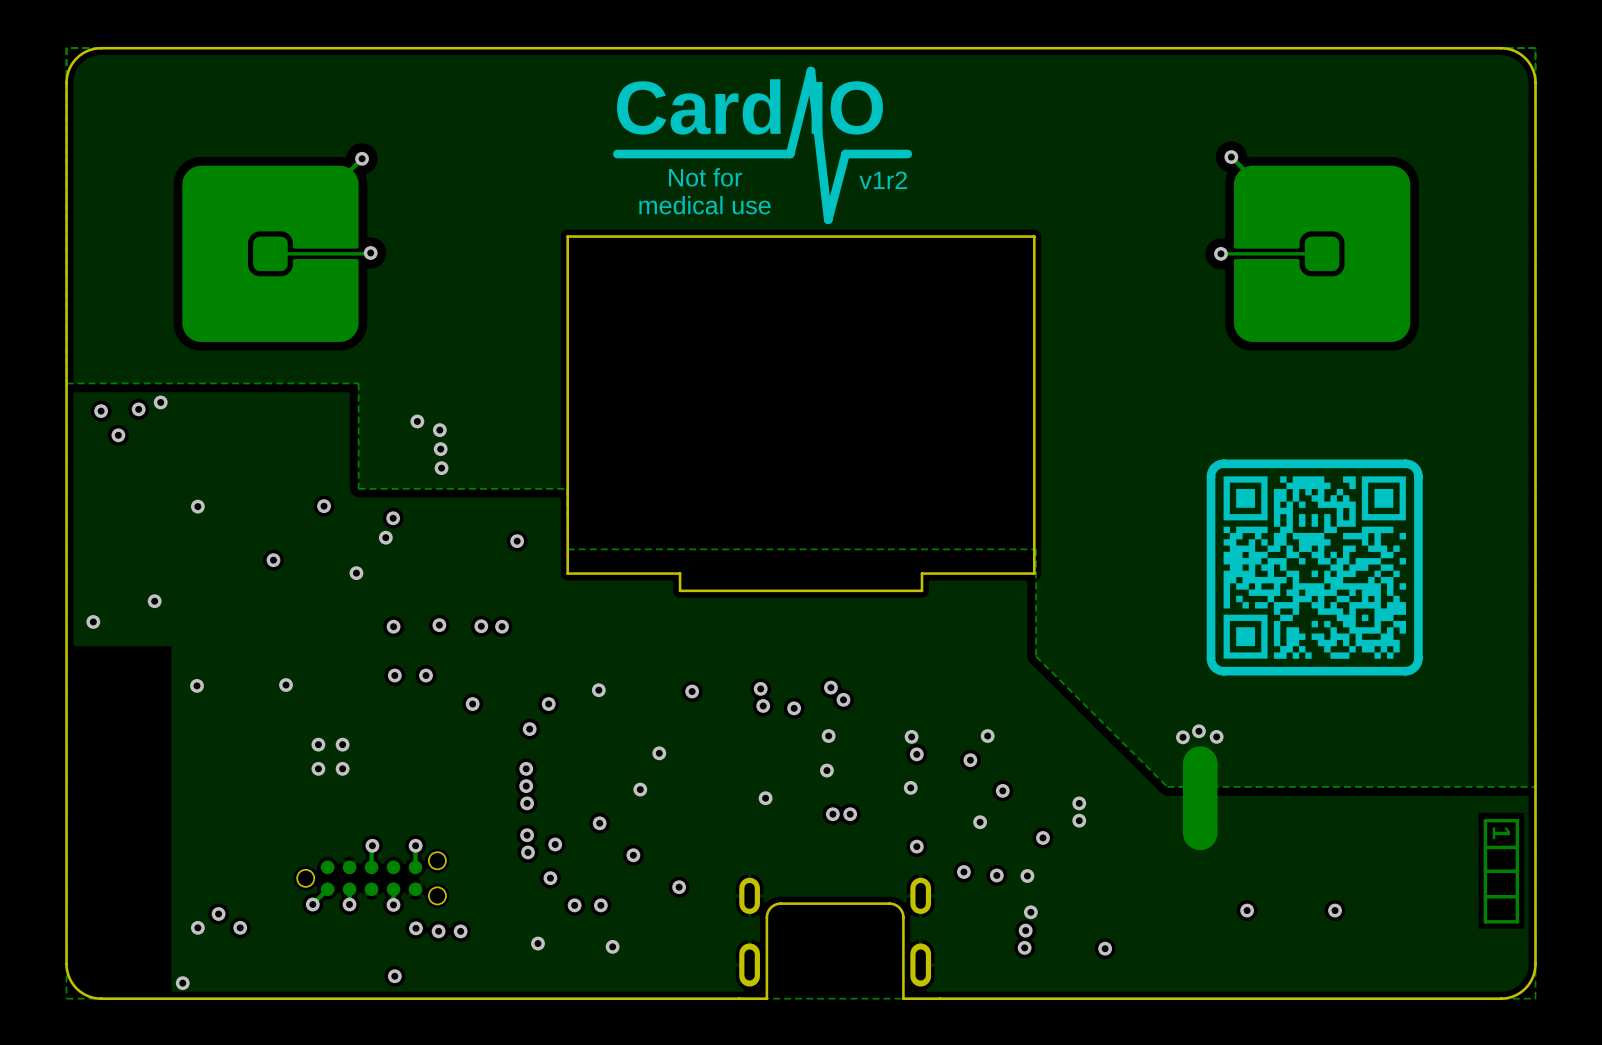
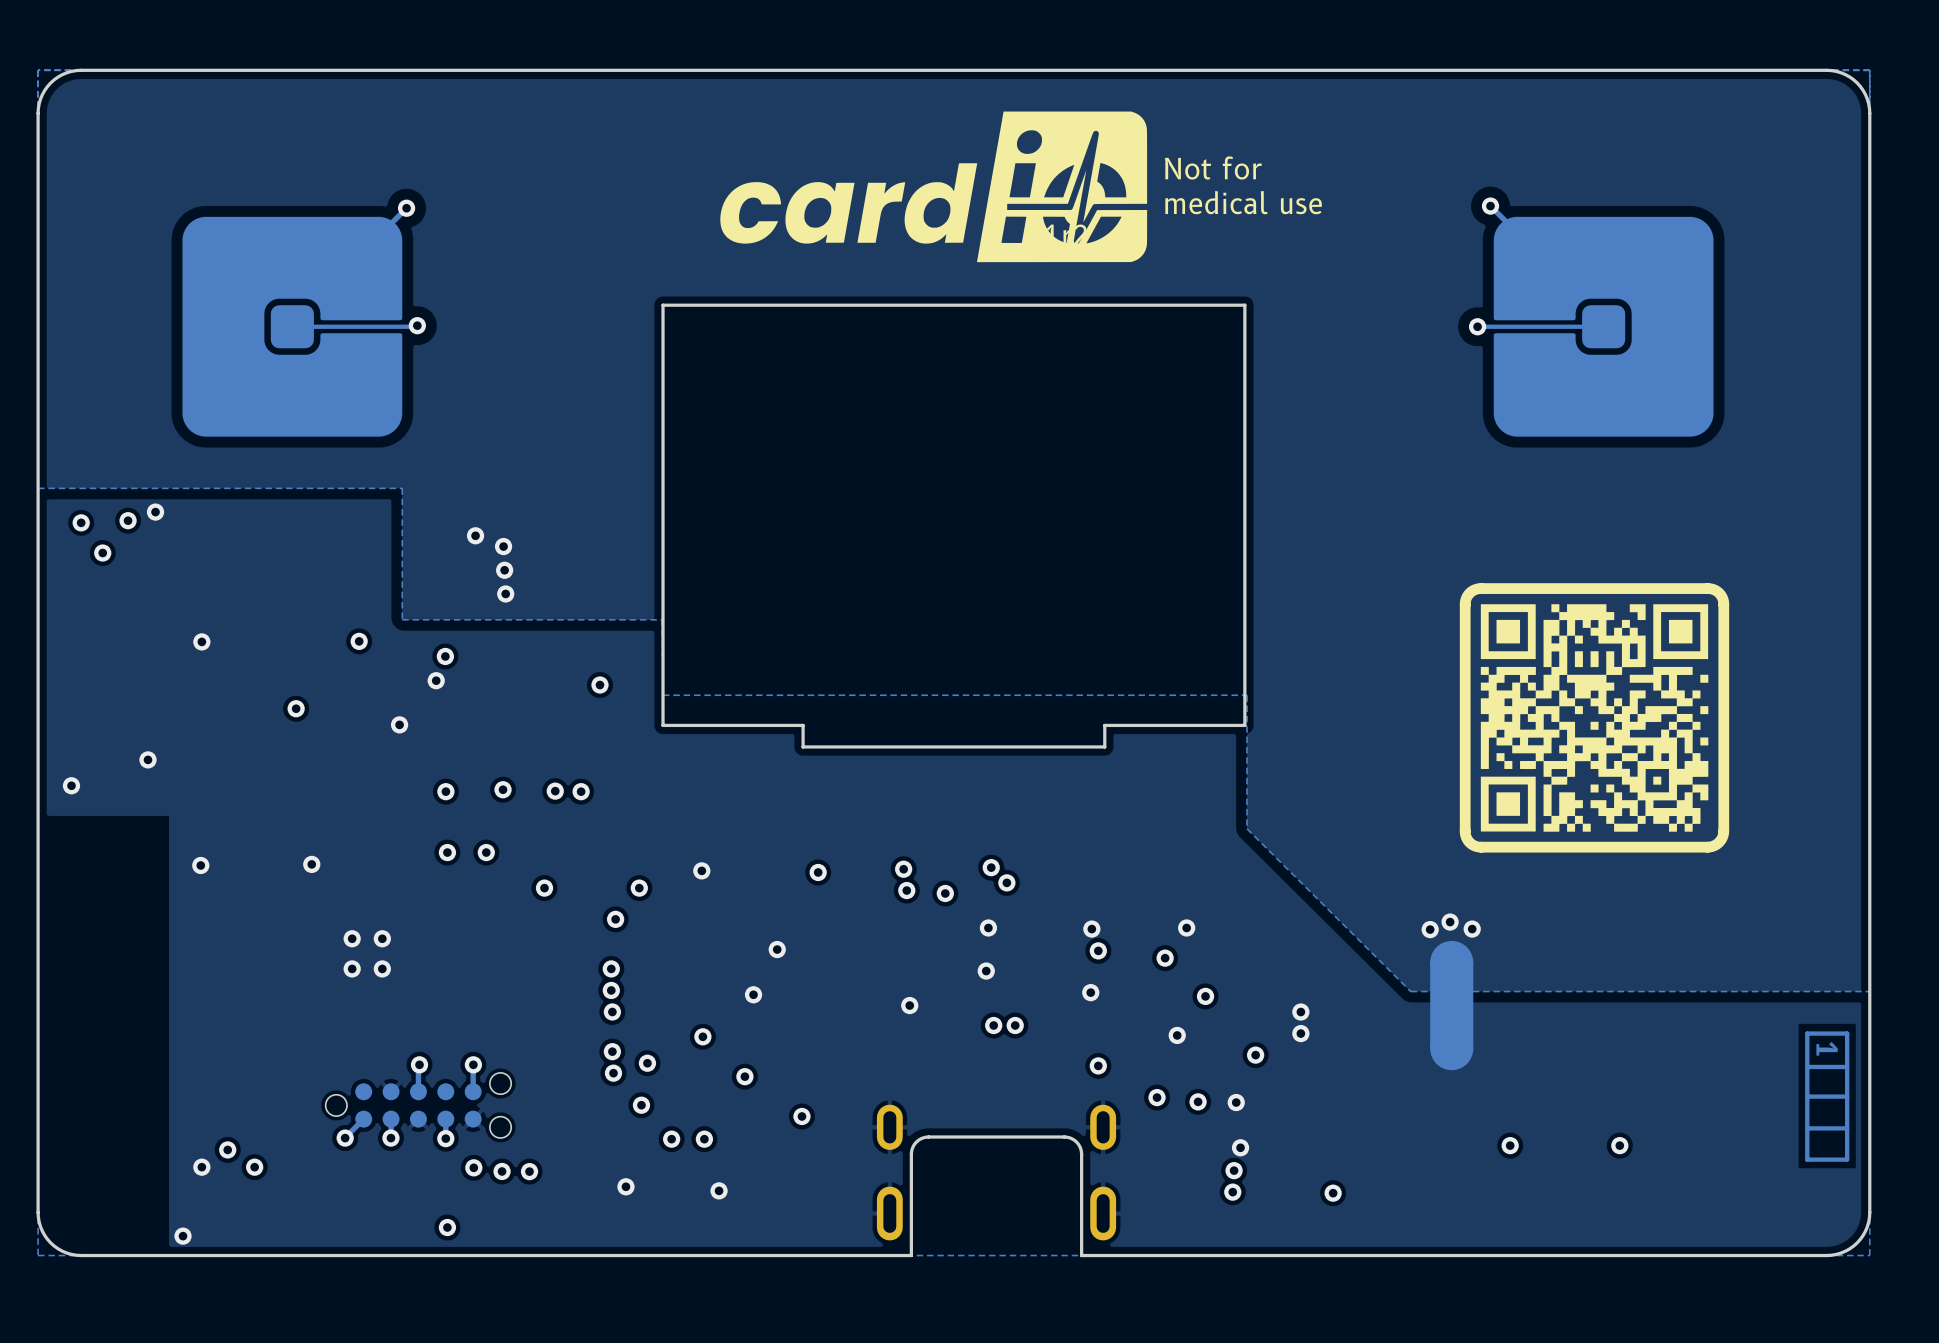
drawing: [613, 66, 913, 225] -> none
drawing: none -> [720, 111, 1148, 263]
text position: Not for (705, 177) -> Not for (1213, 167)
text position: medical use (704, 205) -> medical use (1243, 202)

